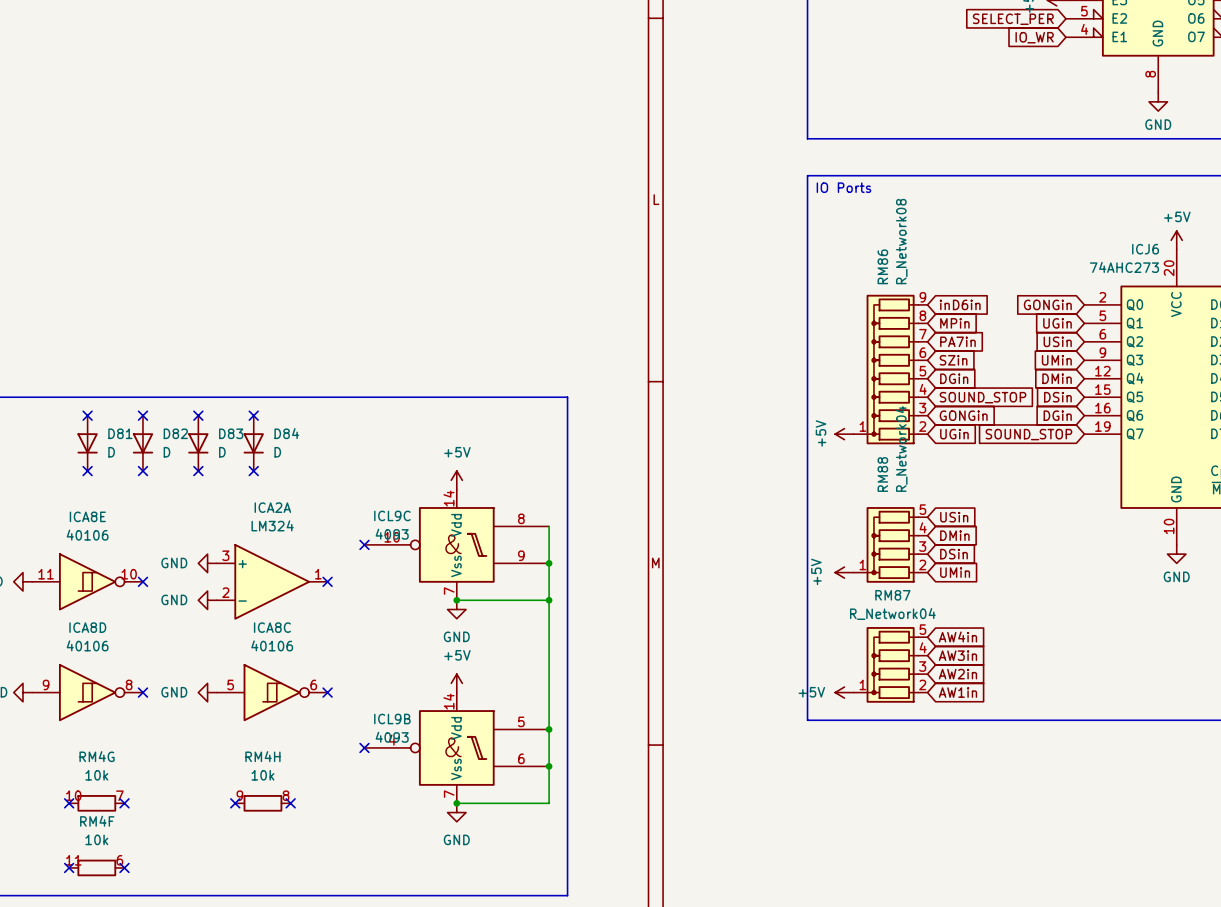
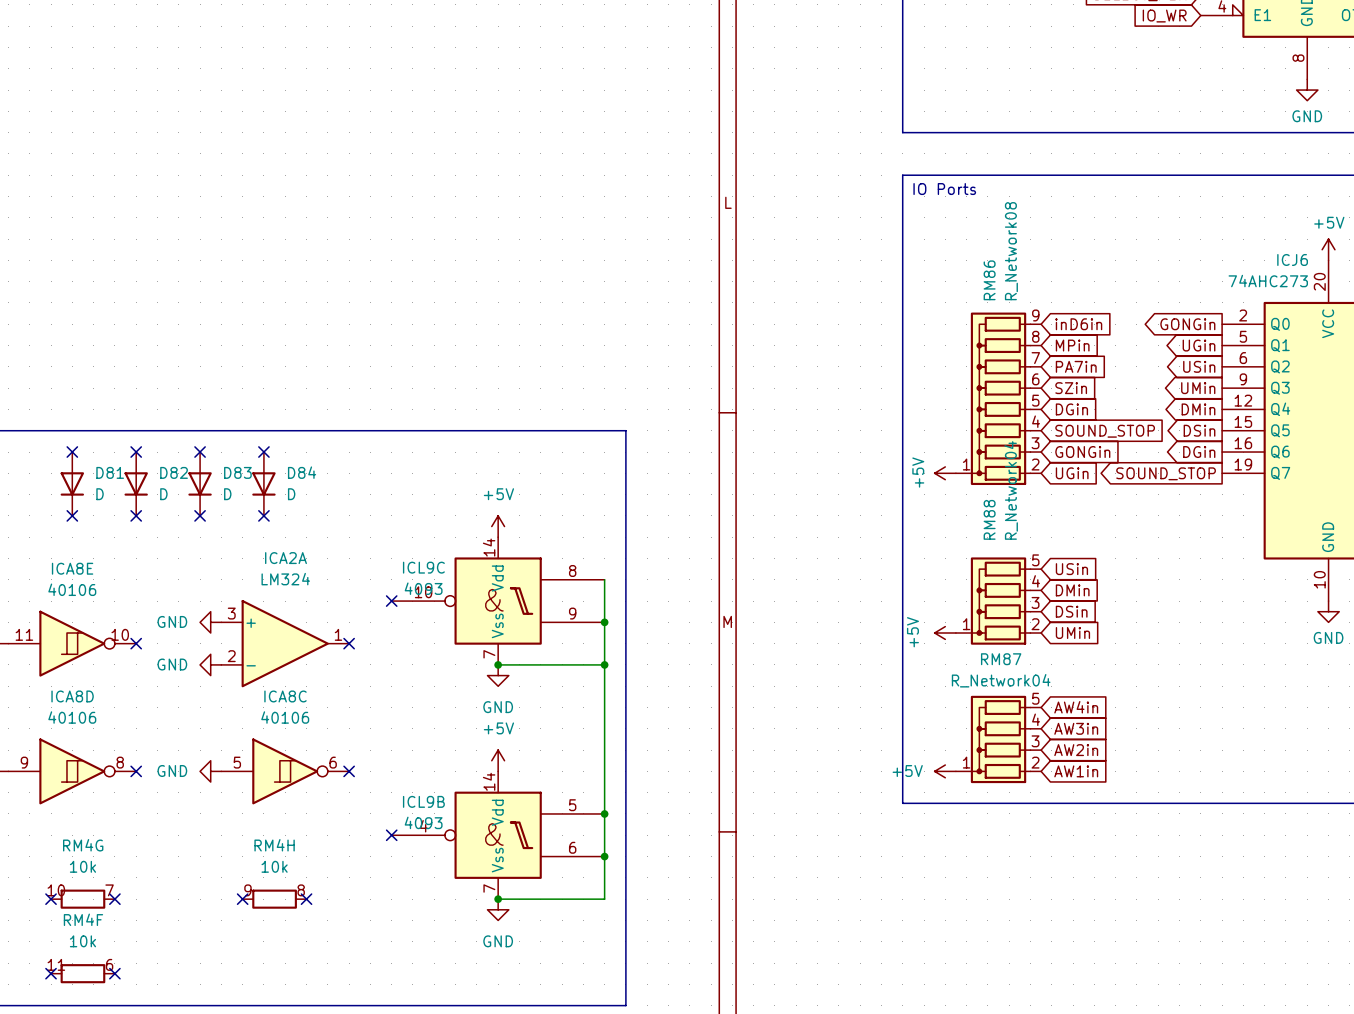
global label shape: input (1047, 304) -> output (1187, 324)
global label shape: input (1057, 323) -> output (1199, 345)
global label shape: input (1057, 341) -> output (1199, 366)
global label shape: input (1056, 360) -> output (1198, 388)
global label shape: input (1057, 378) -> output (1198, 409)
global label shape: input (1057, 397) -> output (1199, 430)
global label shape: input (1057, 415) -> output (1199, 452)
global label shape: input (1028, 434) -> output (1166, 473)

